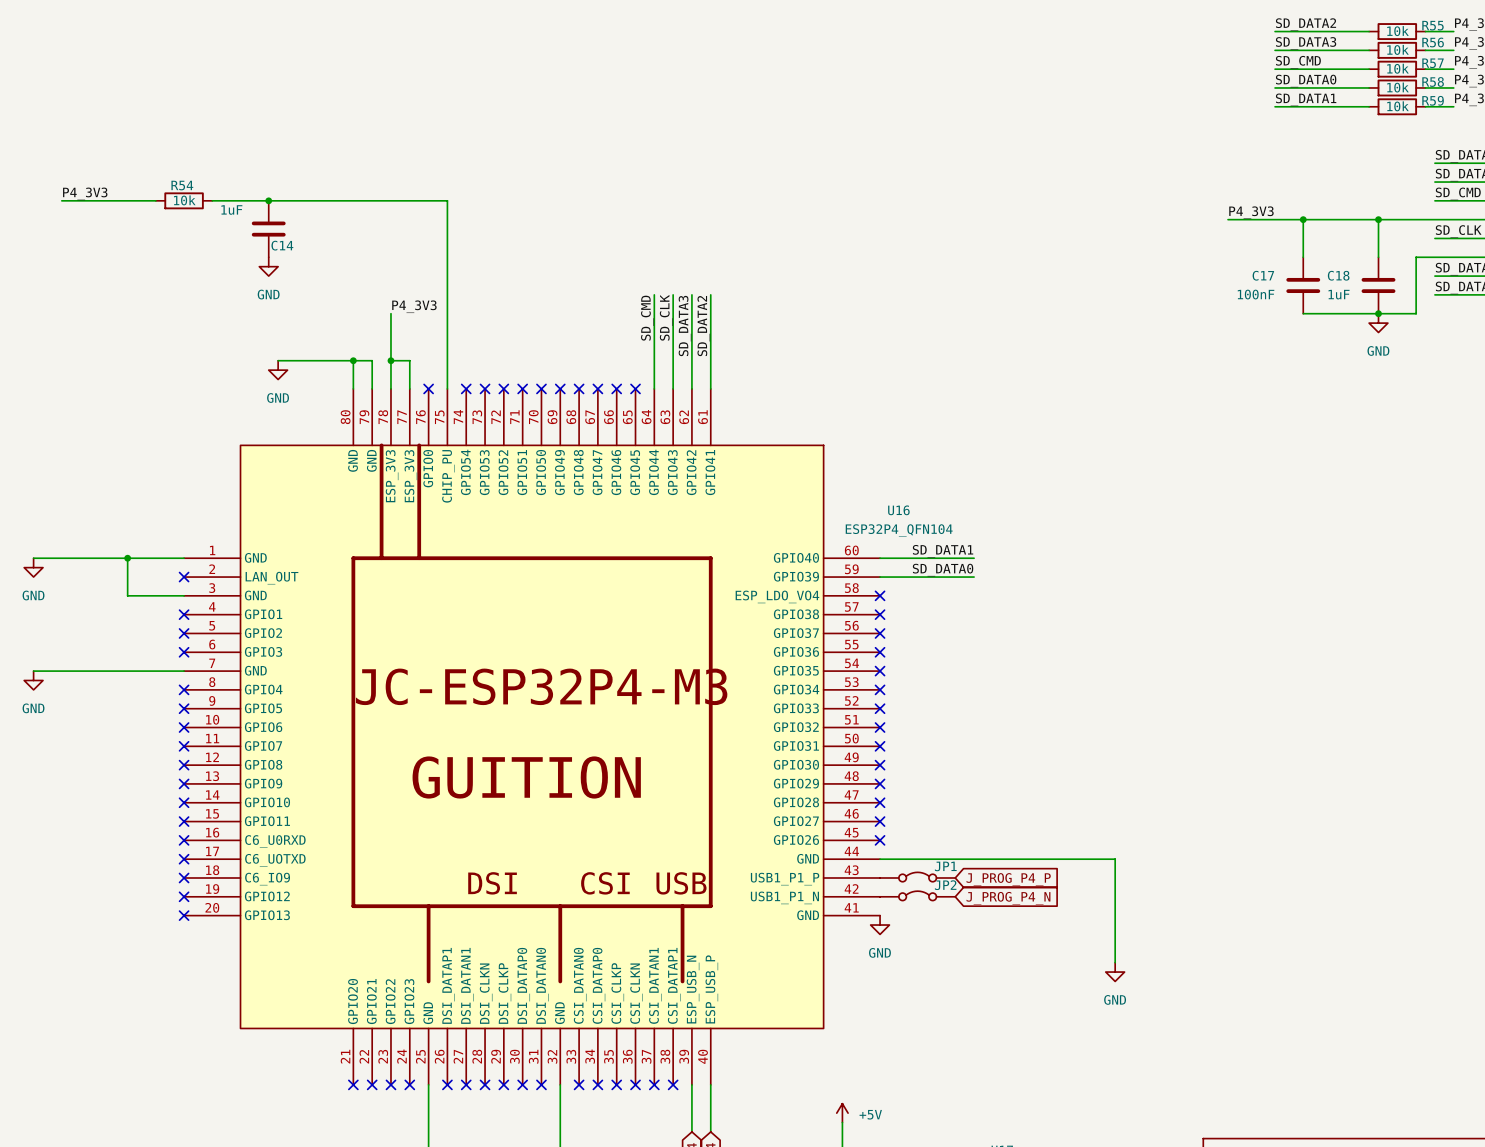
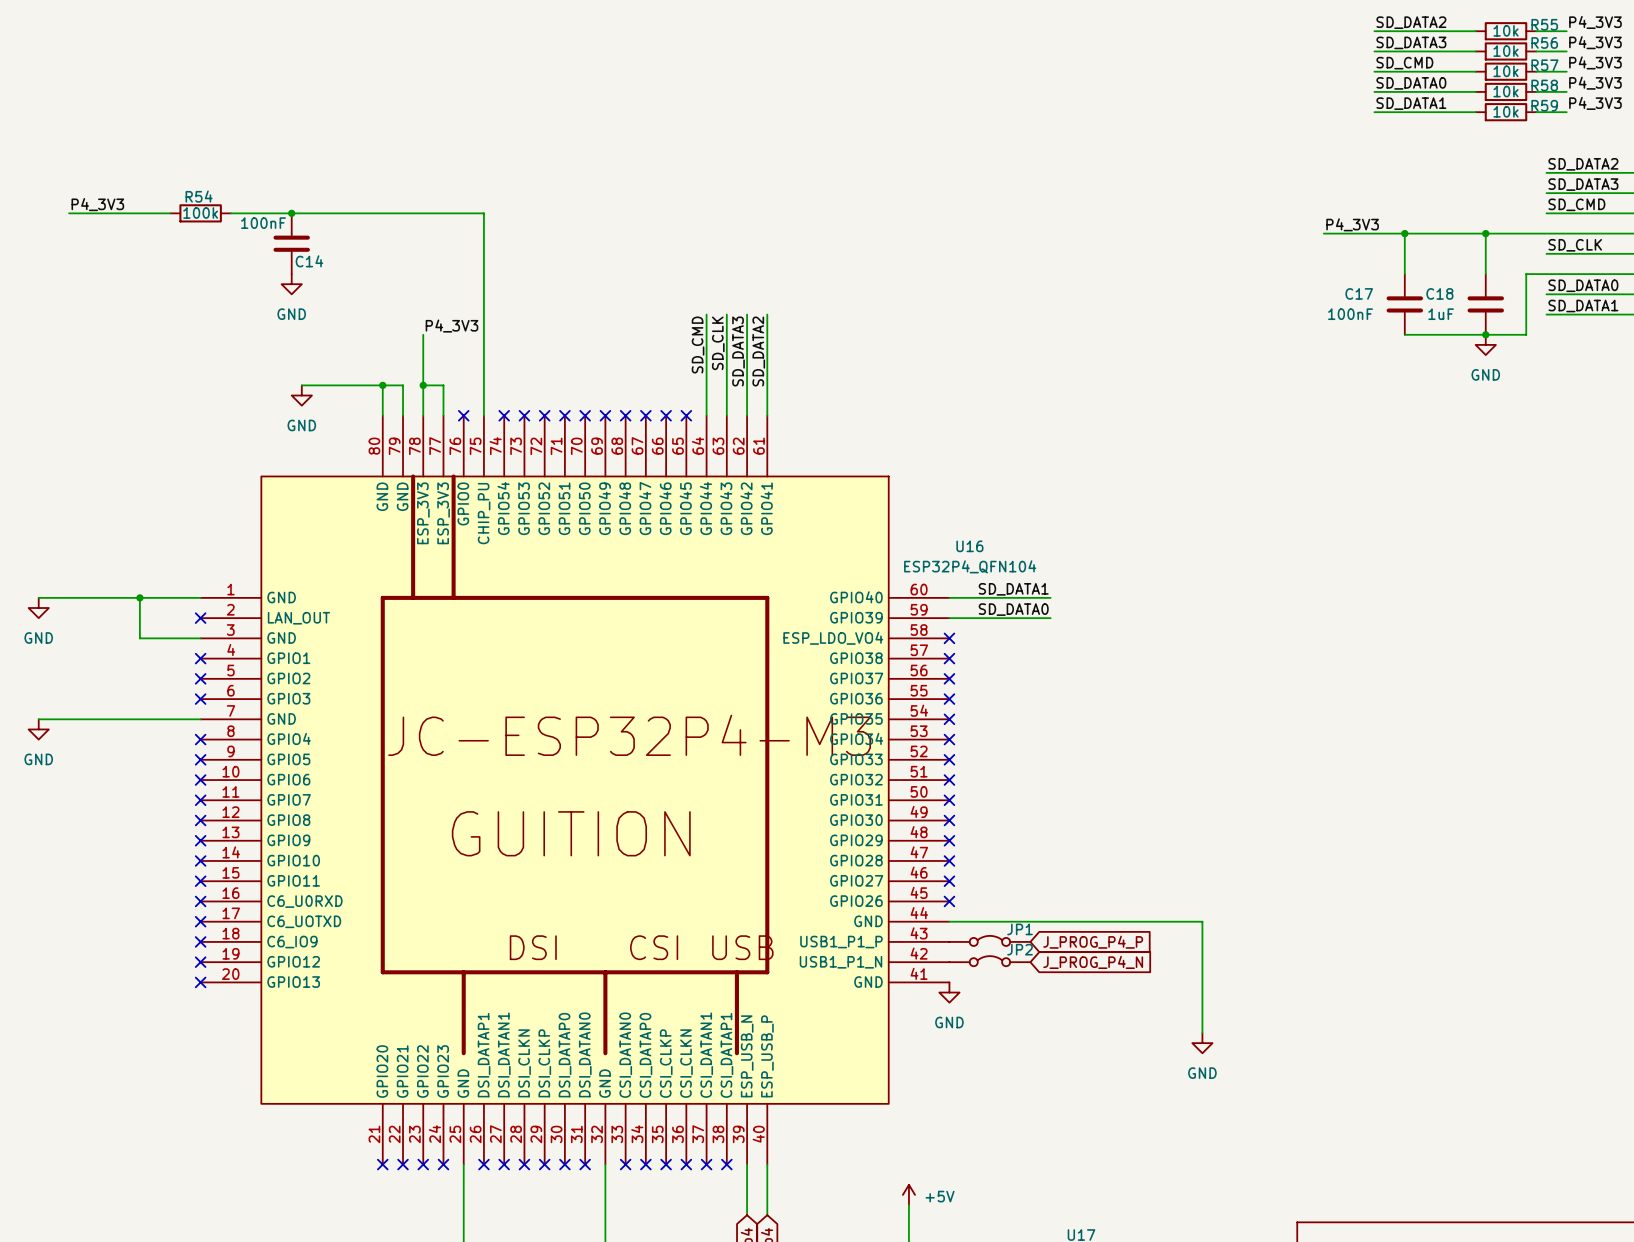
R54 value: 10k (184, 200) -> 100k (200, 212)
C14 value: 1uF (231, 209) -> 100nF (263, 223)

